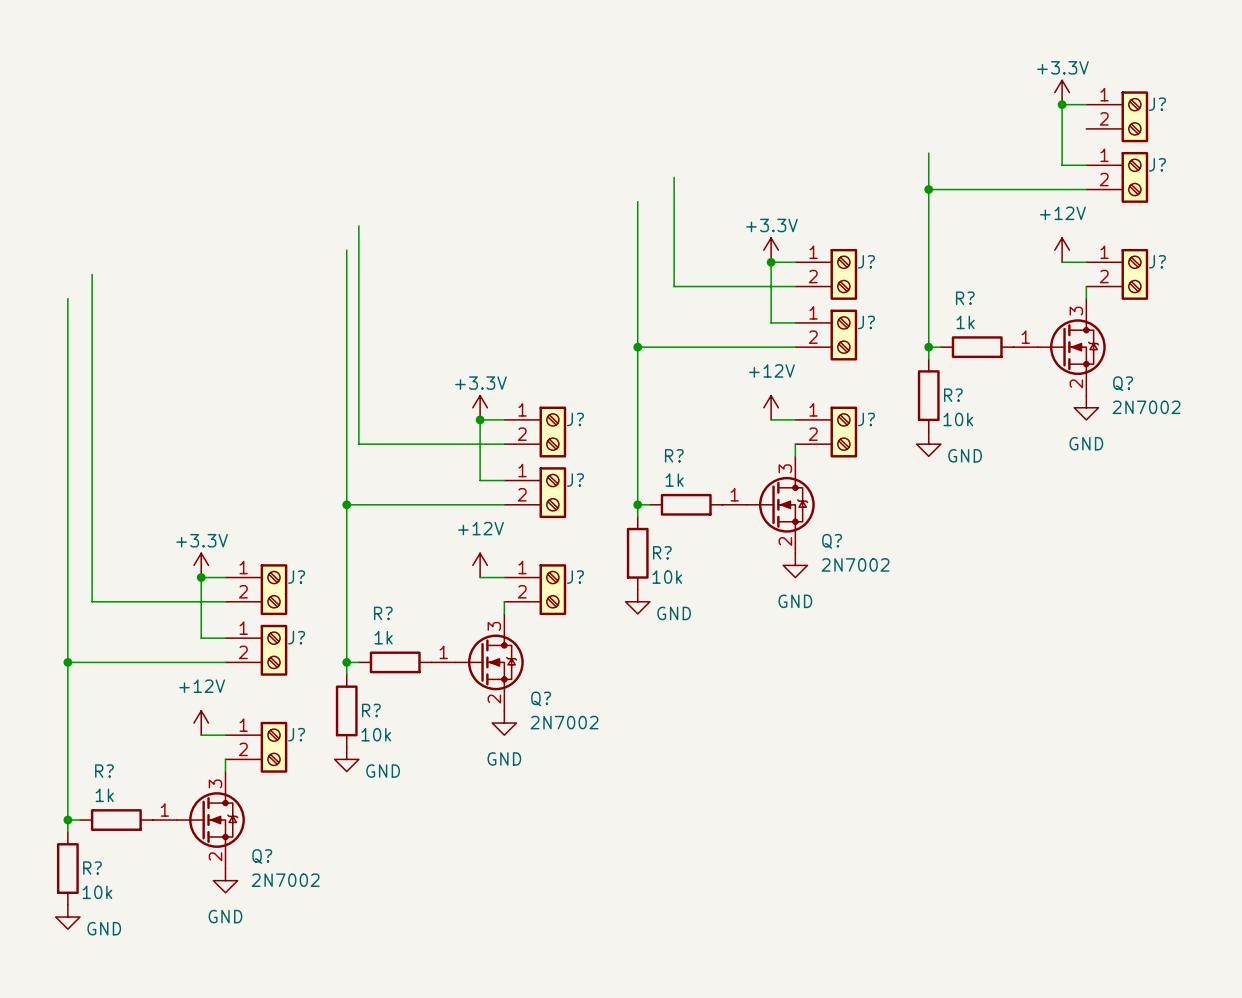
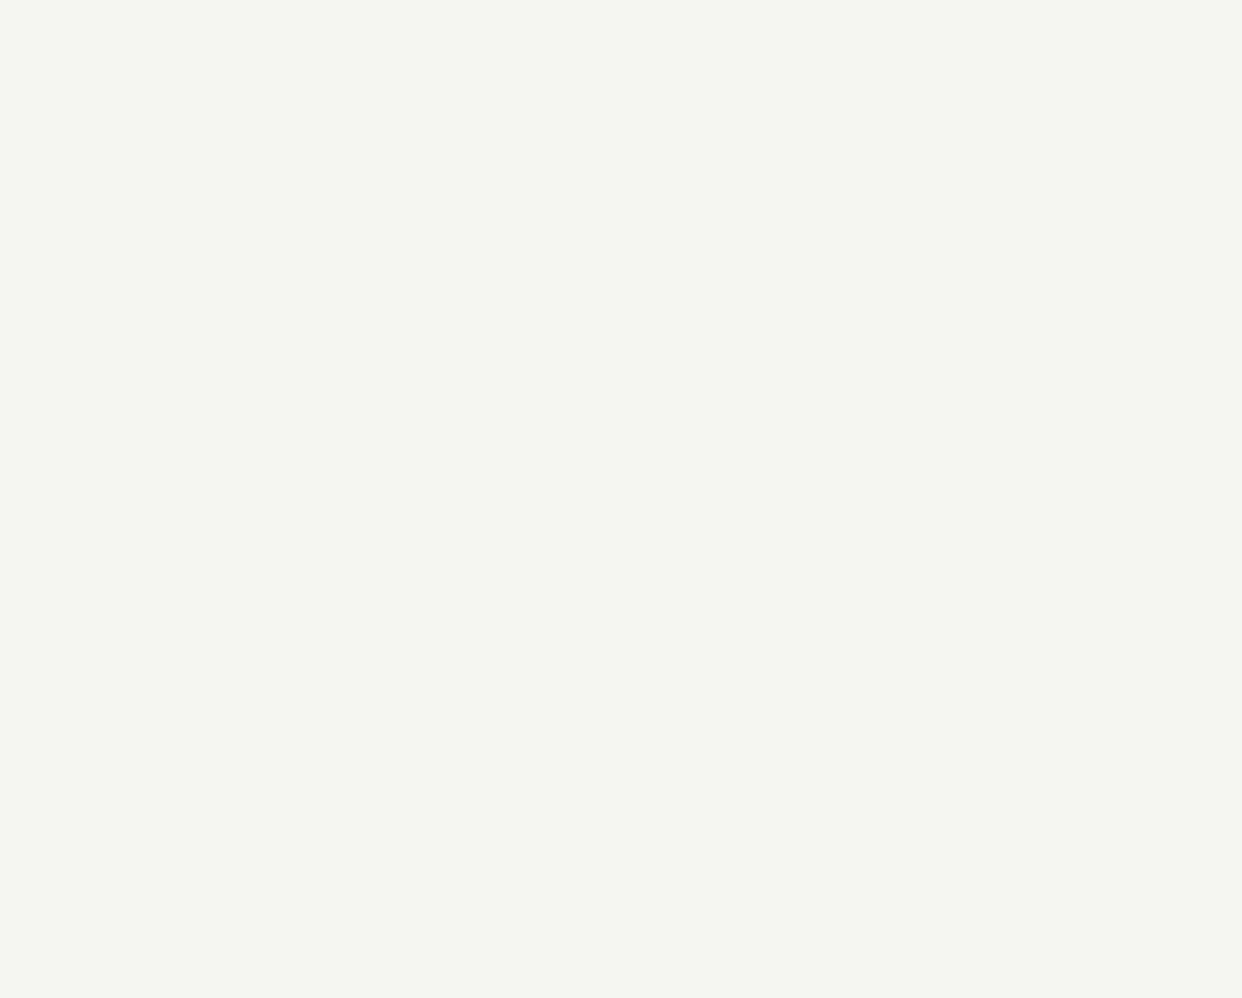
power symbol: +3.3V (1062, 92) -> none
junction: (1062, 104) -> none
wire: (1086, 104) (1062, 104) (1062, 165) (1086, 165) -> none
J?: (1117, 116) -> none
wire: (928, 153) (928, 359) -> none
wire: (674, 177) (674, 286) (795, 286) -> none
J?: (1117, 177) -> none
wire: (928, 189) (1086, 189) -> none
junction: (928, 189) -> none
wire: (637, 201) (637, 516) -> none
wire: (358, 225) (358, 444) (504, 444) -> none
wire: (346, 250) (346, 674) -> none
power symbol: +3.3V (771, 250) -> none
power symbol: +12V (1062, 250) -> none
junction: (771, 262) -> none
wire: (795, 262) (771, 262) (771, 322) (795, 322) -> none
wire: (1062, 262) (1086, 262) -> none
wire: (92, 274) (92, 601) (225, 601) -> none
J?: (826, 274) -> none
J?: (1117, 274) -> none
wire: (1086, 286) (1086, 298) -> none
wire: (67, 298) (67, 832) -> none
J?: (826, 335) -> none
wire: (637, 347) (795, 347) -> none
junction: (637, 347) -> none
wire: (928, 347) (940, 347) -> none
junction: (928, 347) -> none
R?: 1k (977, 347) -> none
Q?: 2N7002 (1059, 347) -> none
R?: 10k (928, 395) -> none
power symbol: +3.3V (480, 407) -> none
power symbol: +12V (771, 407) -> none
power symbol: GND (1086, 407) -> none
junction: (480, 419) -> none
wire: (504, 419) (480, 419) (480, 480) (504, 480) -> none
wire: (771, 419) (795, 419) -> none
J?: (535, 432) -> none
J?: (826, 432) -> none
wire: (795, 444) (795, 456) -> none
power symbol: GND (928, 444) -> none
J?: (535, 492) -> none
wire: (346, 504) (504, 504) -> none
junction: (346, 504) -> none
wire: (637, 504) (649, 504) -> none
junction: (637, 504) -> none
R?: 1k (686, 504) -> none
Q?: 2N7002 (768, 504) -> none
R?: 10k (637, 553) -> none
power symbol: +3.3V (201, 565) -> none
power symbol: +12V (480, 565) -> none
power symbol: GND (795, 565) -> none
junction: (201, 577) -> none
wire: (225, 577) (201, 577) (201, 638) (225, 638) -> none
wire: (480, 577) (504, 577) -> none
J?: (256, 589) -> none
J?: (535, 589) -> none
wire: (504, 601) (504, 613) -> none
power symbol: GND (637, 601) -> none
J?: (256, 650) -> none
wire: (67, 662) (225, 662) -> none
junction: (67, 662) -> none
wire: (346, 662) (358, 662) -> none
junction: (346, 662) -> none
R?: 1k (395, 662) -> none
Q?: 2N7002 (477, 662) -> none
R?: 10k (346, 710) -> none
power symbol: +12V (201, 723) -> none
power symbol: GND (504, 723) -> none
wire: (201, 735) (225, 735) -> none
J?: (256, 747) -> none
wire: (225, 759) (225, 771) -> none
power symbol: GND (346, 759) -> none
wire: (67, 820) (79, 820) -> none
junction: (67, 820) -> none
R?: 1k (116, 820) -> none
Q?: 2N7002 (198, 820) -> none
R?: 10k (67, 868) -> none
power symbol: GND (225, 880) -> none
power symbol: GND (67, 917) -> none

